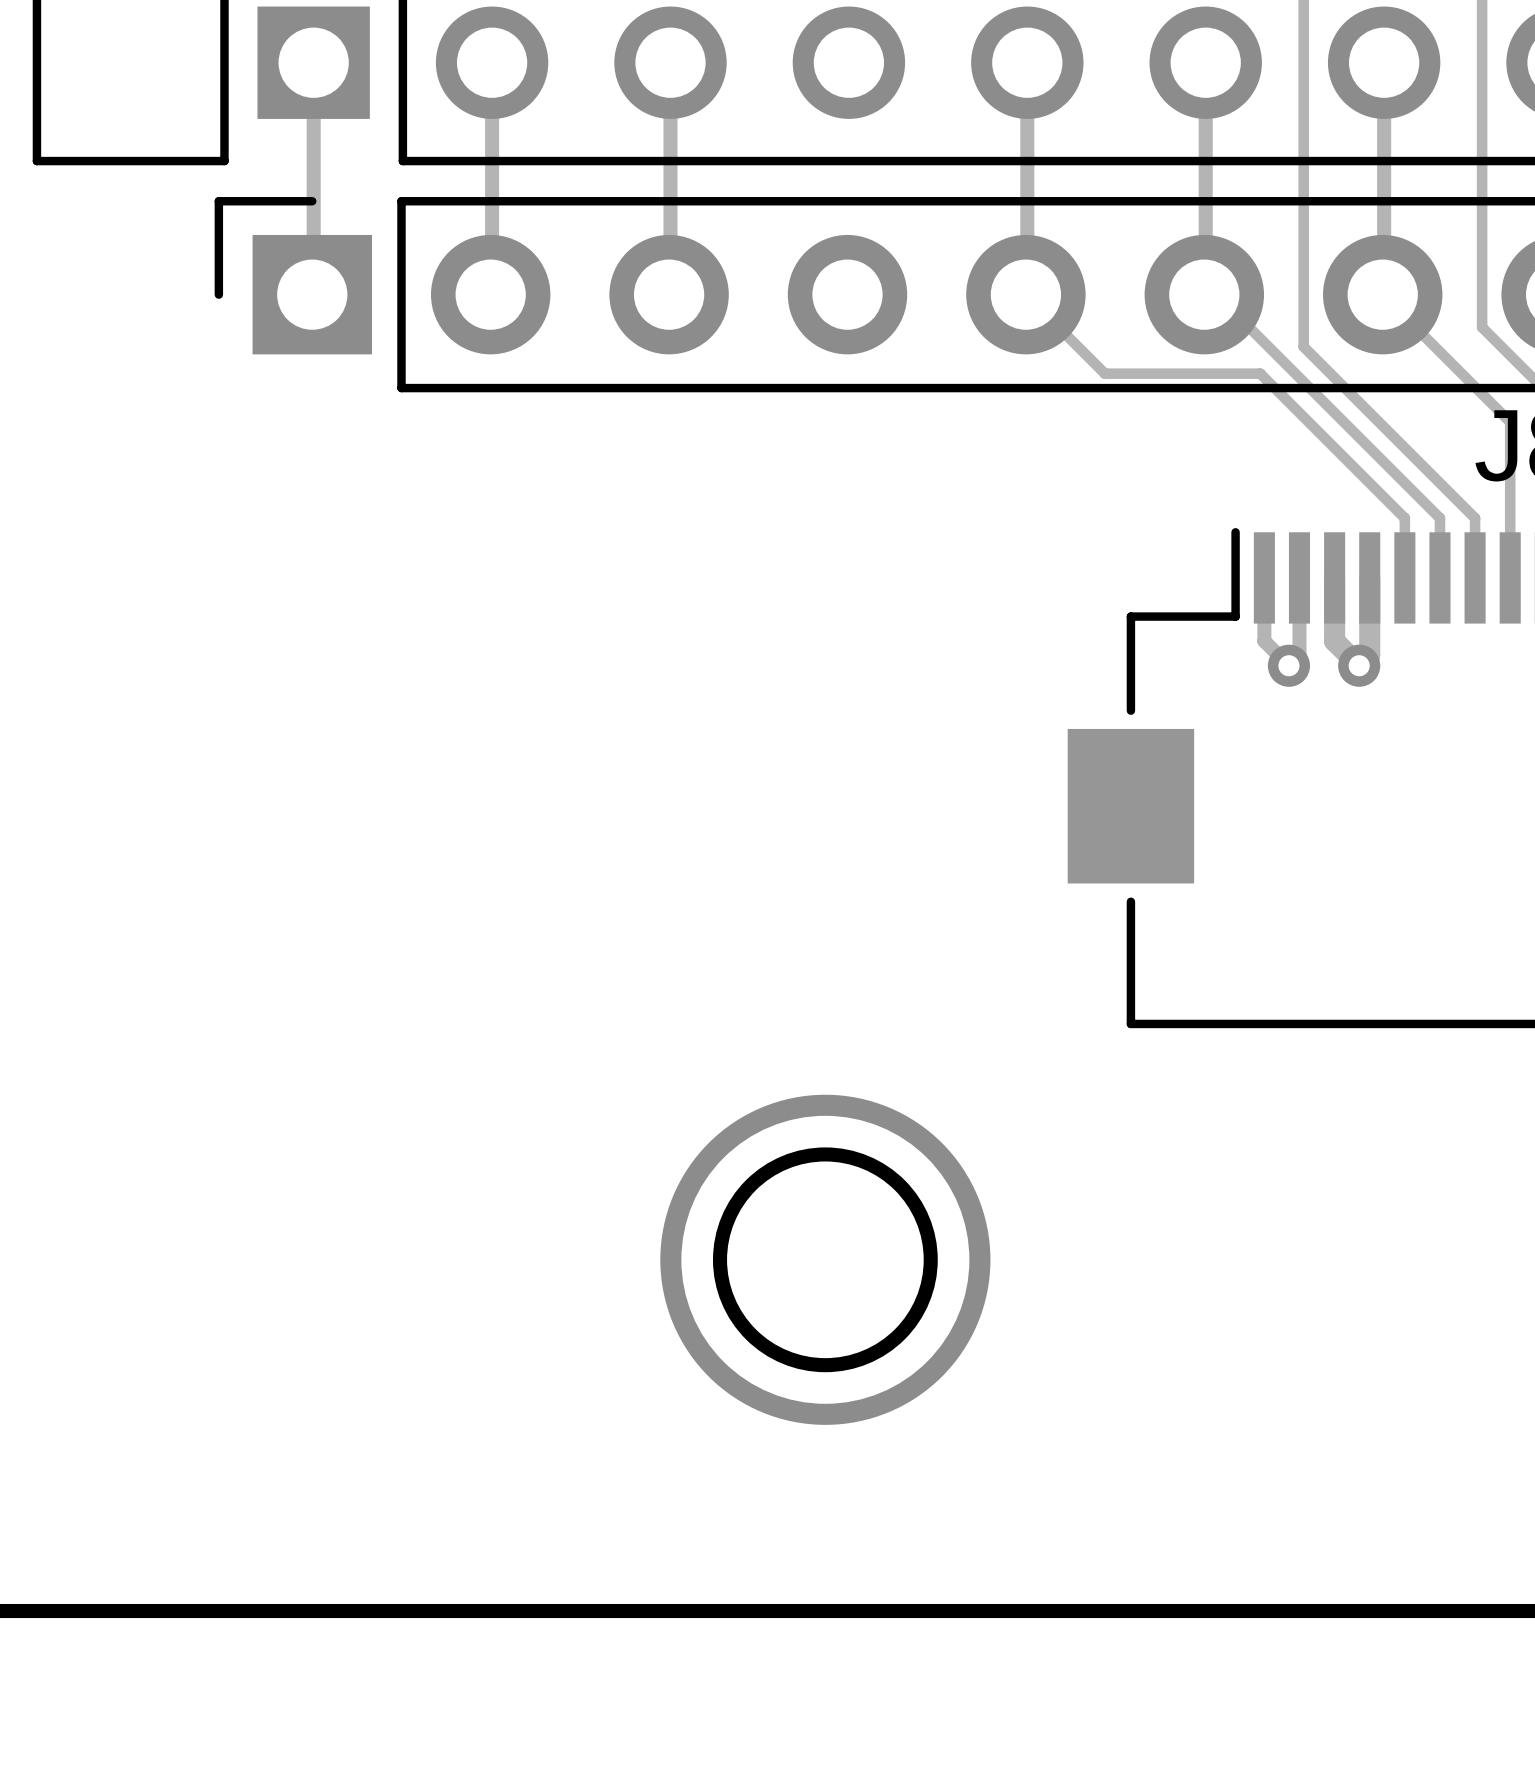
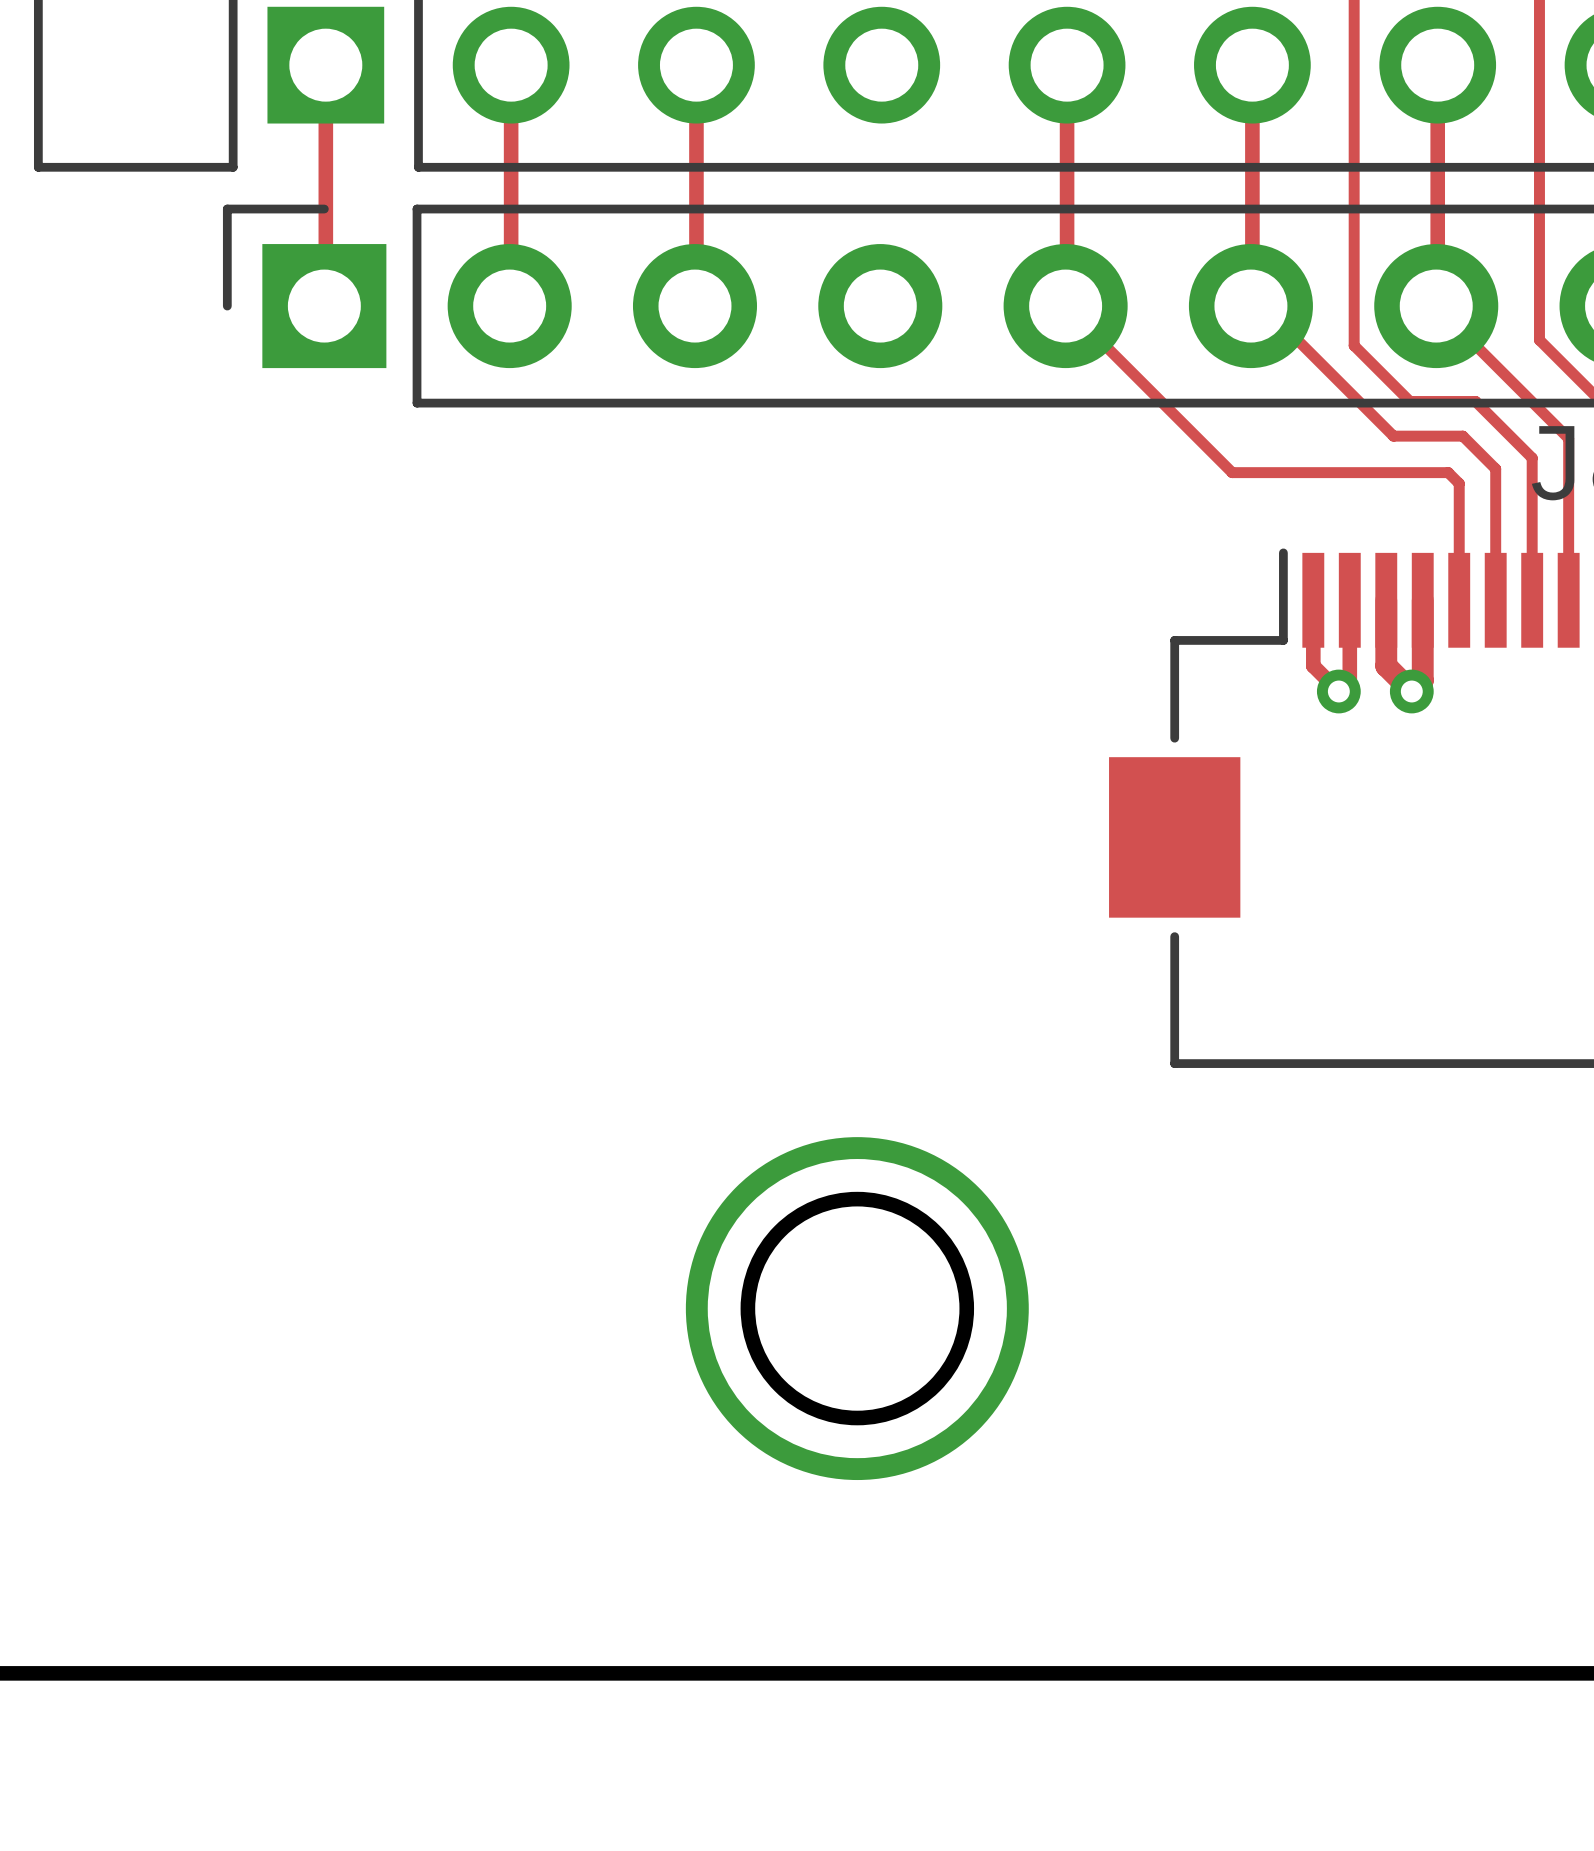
track: (1303, 332) (1303, 346) (1475, 518) -> (1354, 345) (1409, 401) (1475, 401) (1532, 458) (1532, 538)
track: (1104, 373) (1260, 373) (1404, 518) -> (1147, 388) (1232, 472) (1448, 472) (1459, 483) (1459, 538)
track: (1341, 419) (1439, 518) -> (1393, 436) (1462, 436) (1495, 468) (1495, 538)

